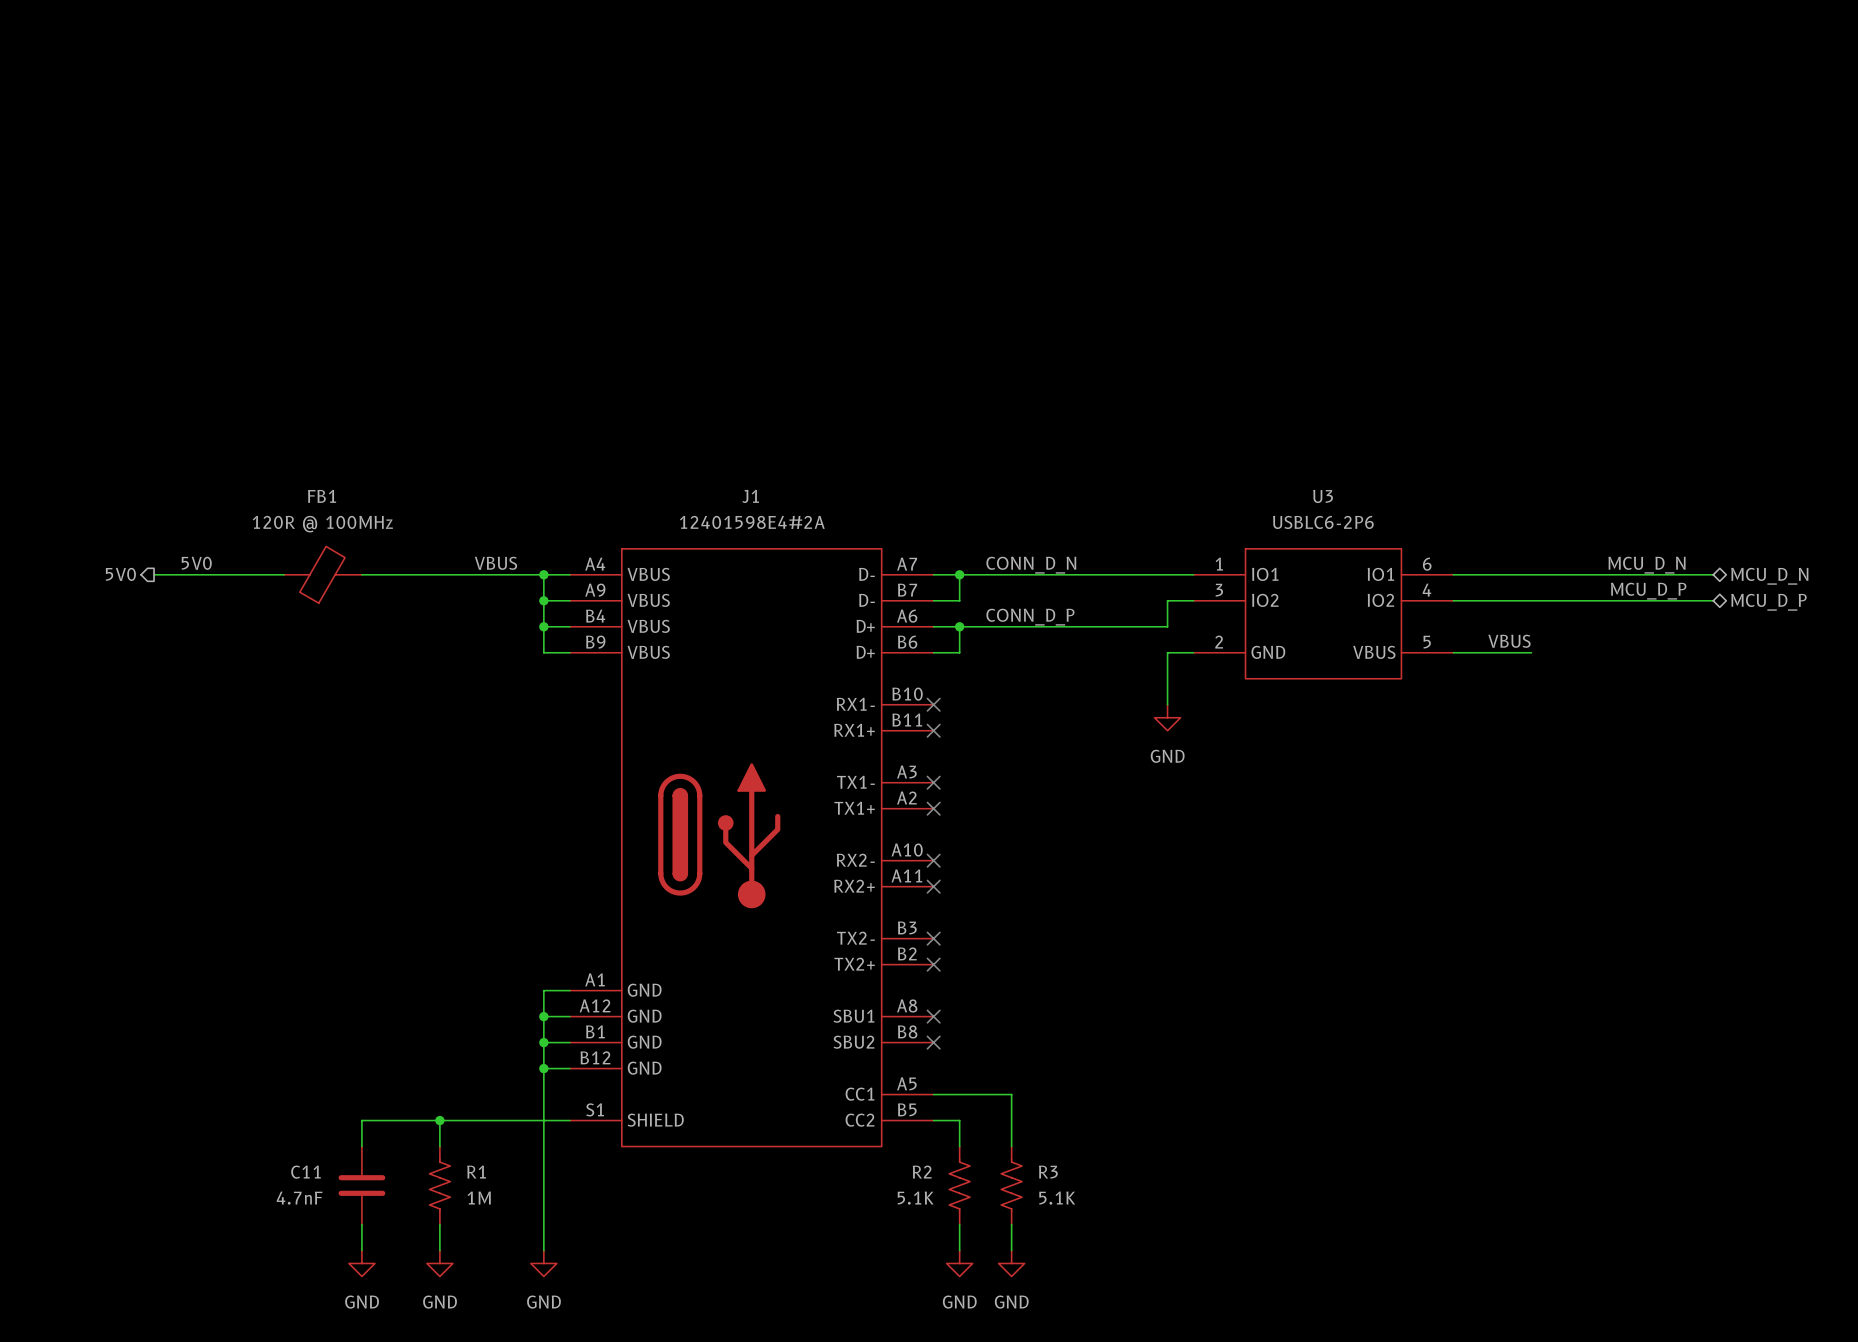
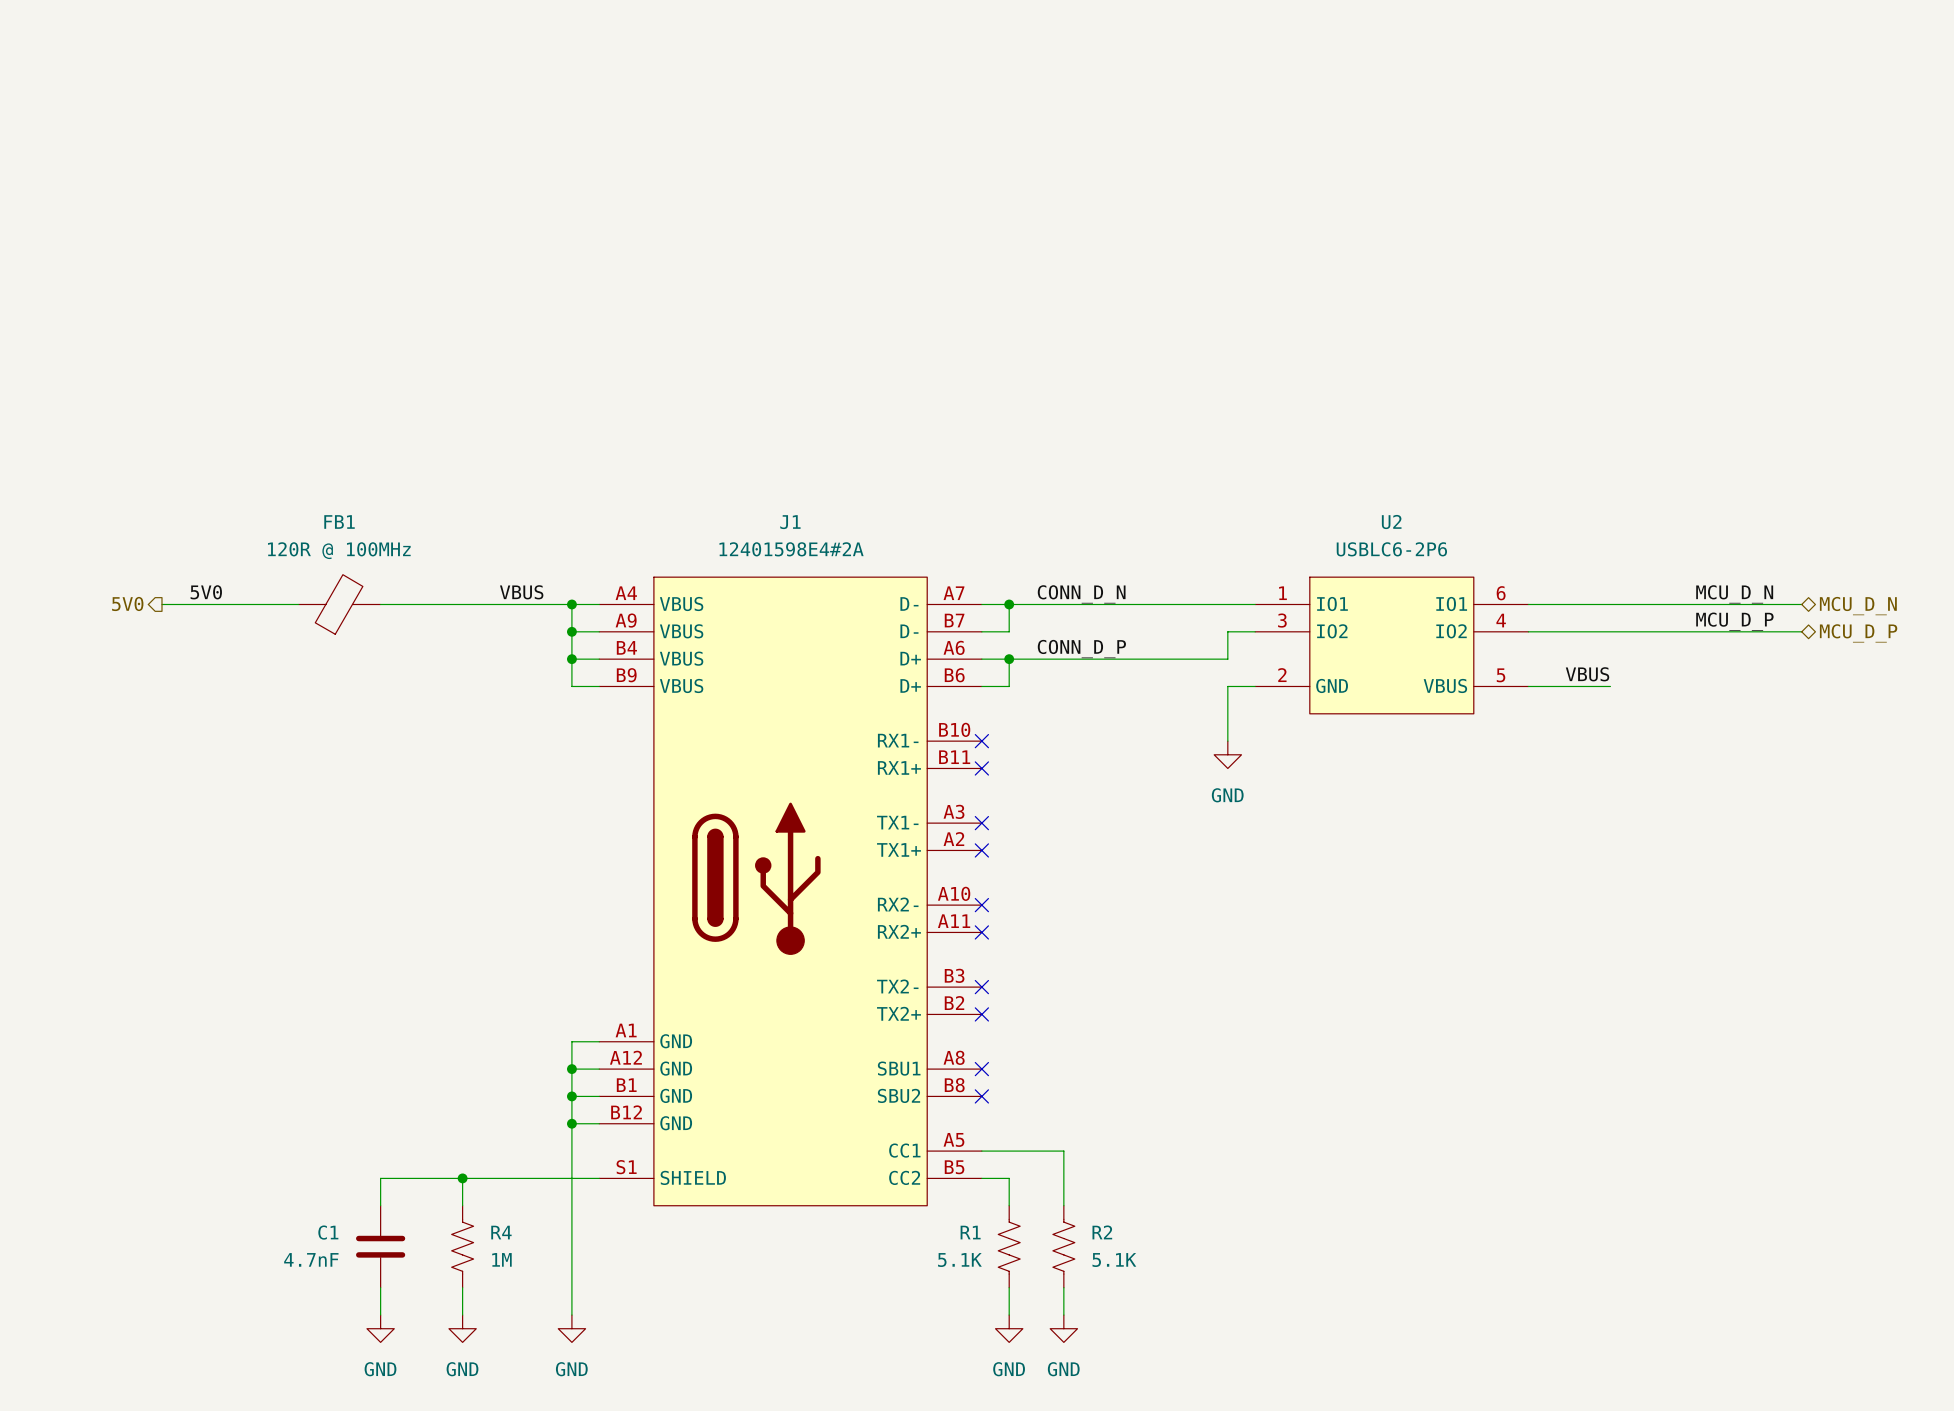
U3 name: U3 (1323, 496) -> U2 (1391, 522)
C11 name: C11 (306, 1172) -> C1 (328, 1232)
R1 name: R1 (476, 1172) -> R4 (501, 1232)
R2 name: R2 (922, 1172) -> R1 (970, 1232)
R3 name: R3 (1048, 1172) -> R2 (1102, 1232)

